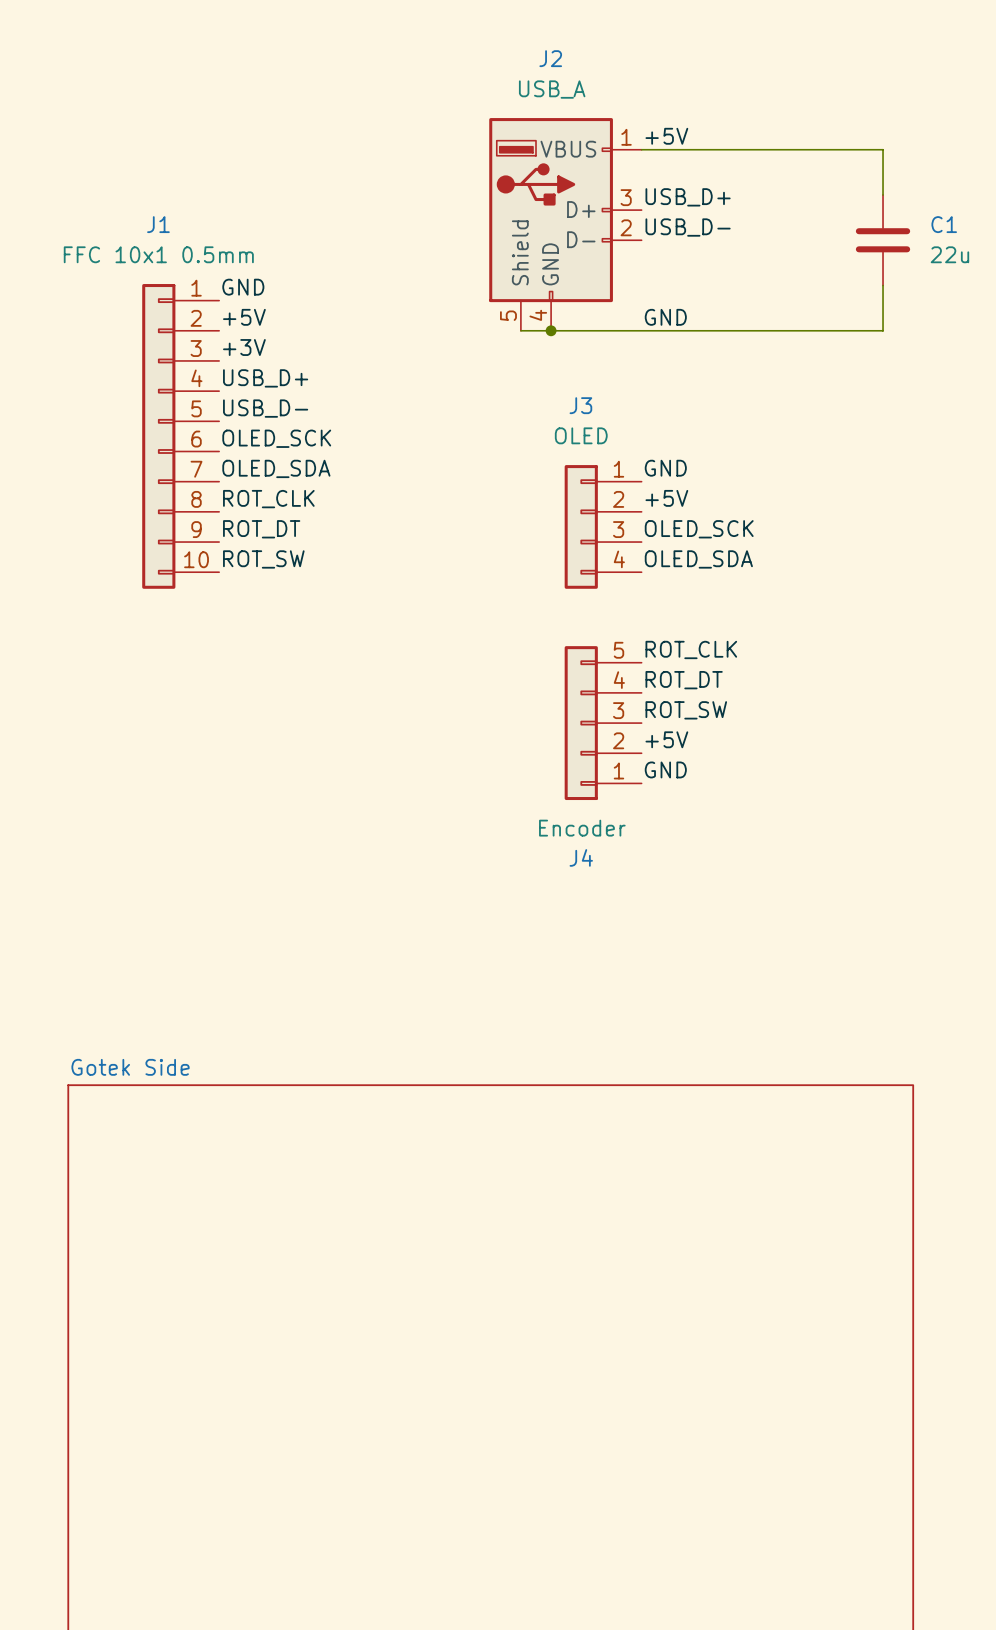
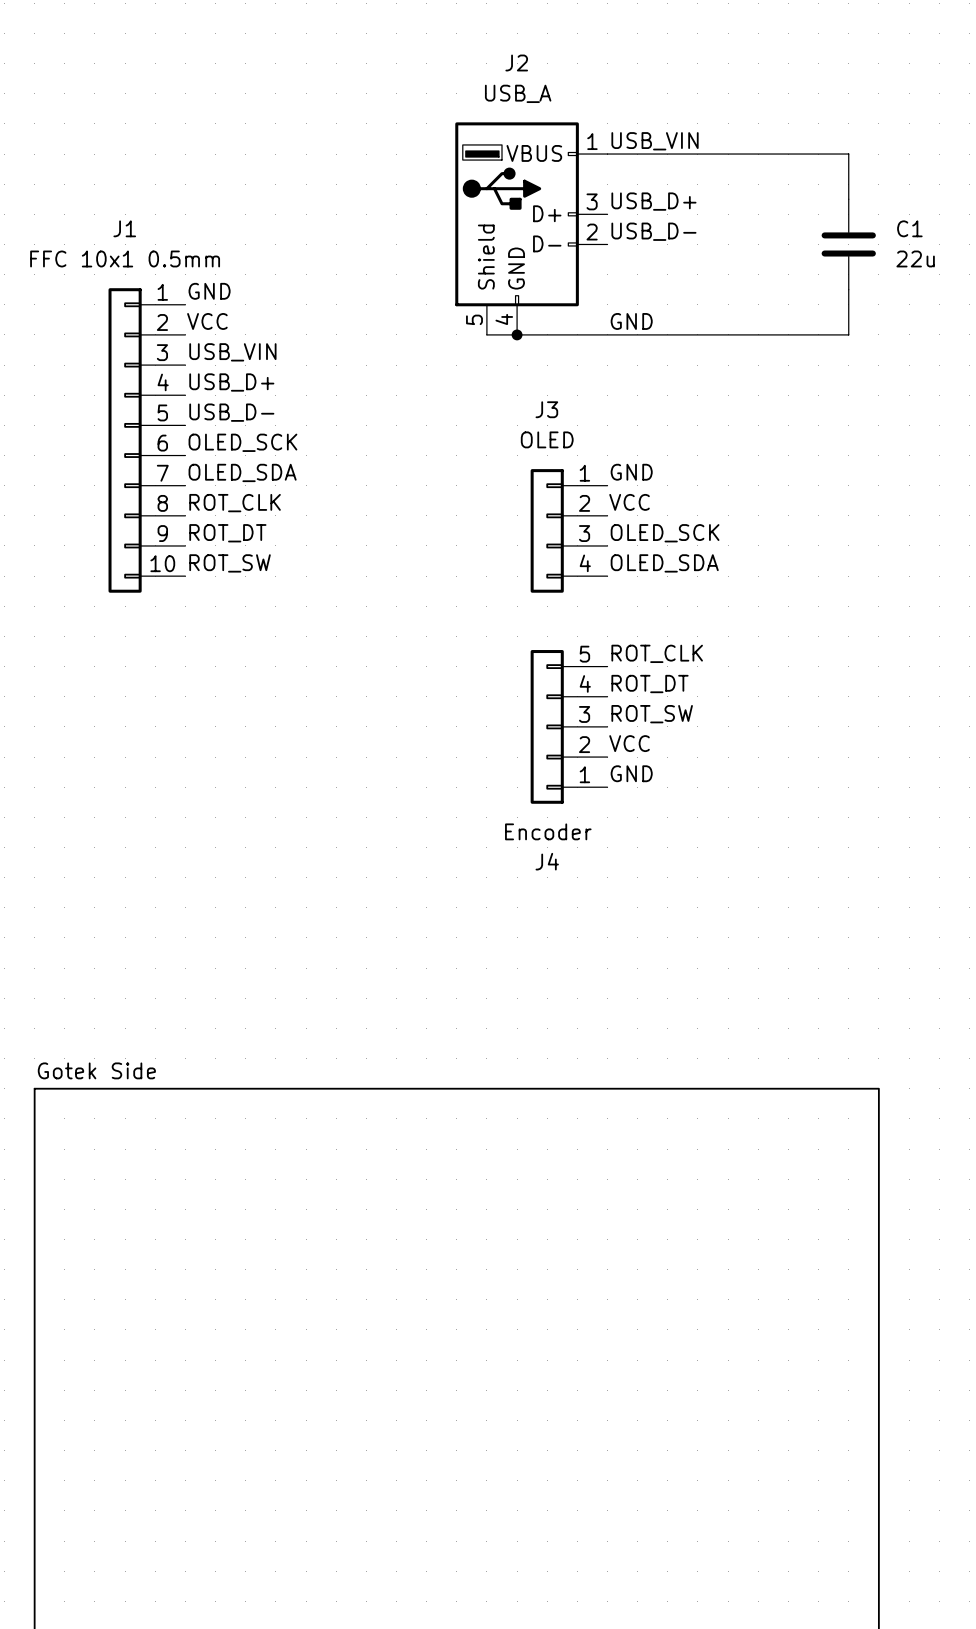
label: +5V (666, 136) -> USB_VIN (655, 141)
label: +5V (244, 317) -> VCC (207, 321)
label: +3V (244, 347) -> USB_VIN (232, 352)
label: +5V (666, 498) -> VCC (629, 502)
label: +5V (666, 739) -> VCC (629, 743)

